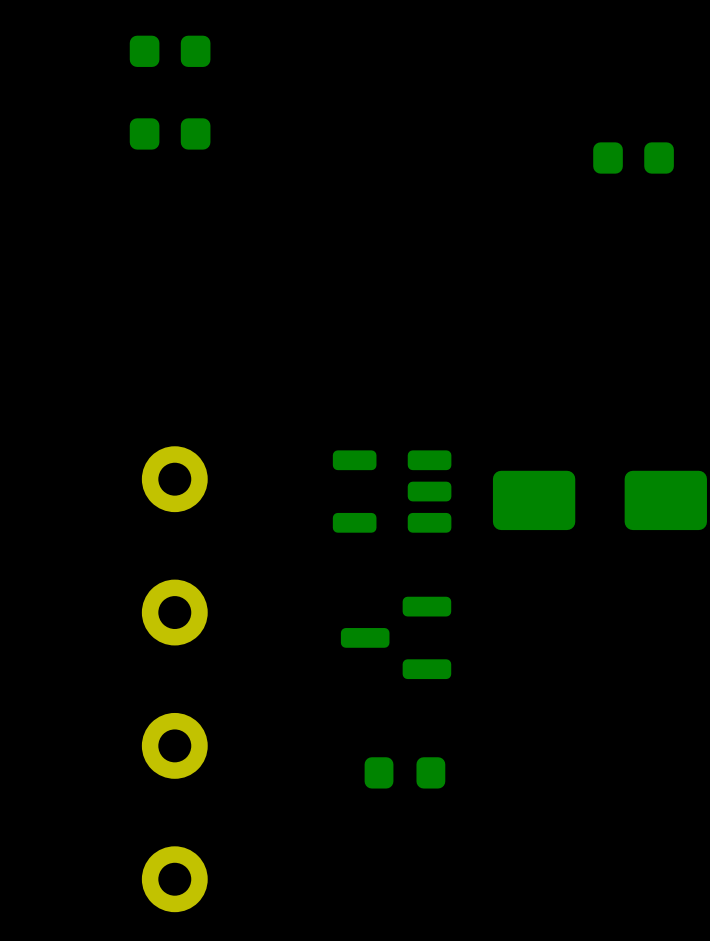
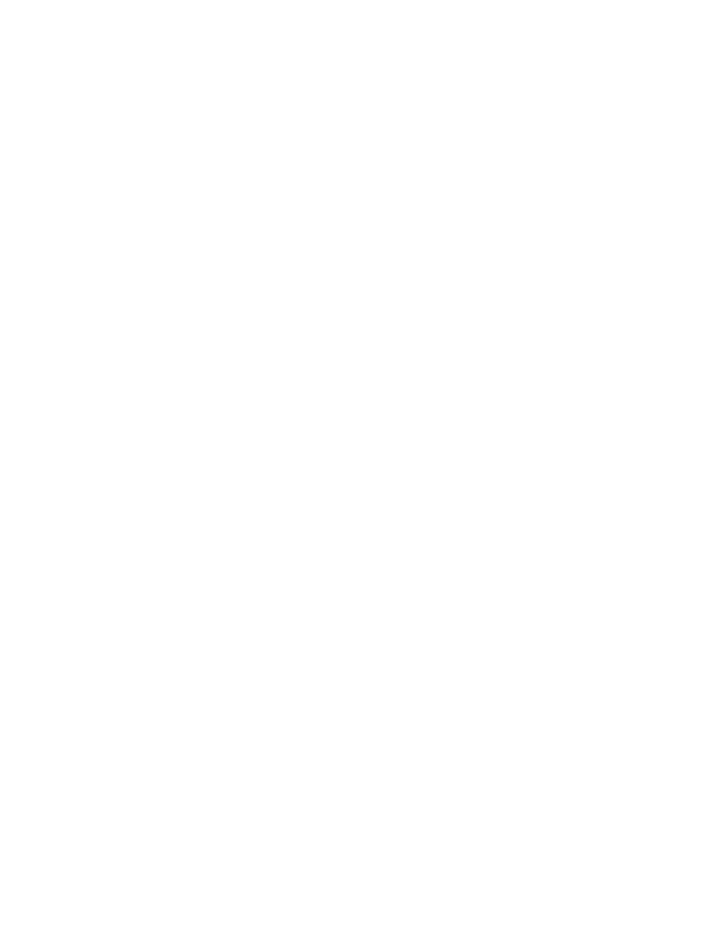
part: (170, 51) -> none
part: (170, 133) -> none
part: (633, 158) -> none
part: (174, 479) -> none
part: (392, 491) -> none
part: (599, 500) -> none
part: (174, 612) -> none
part: (396, 637) -> none
part: (174, 745) -> none
part: (404, 772) -> none
part: (174, 879) -> none

